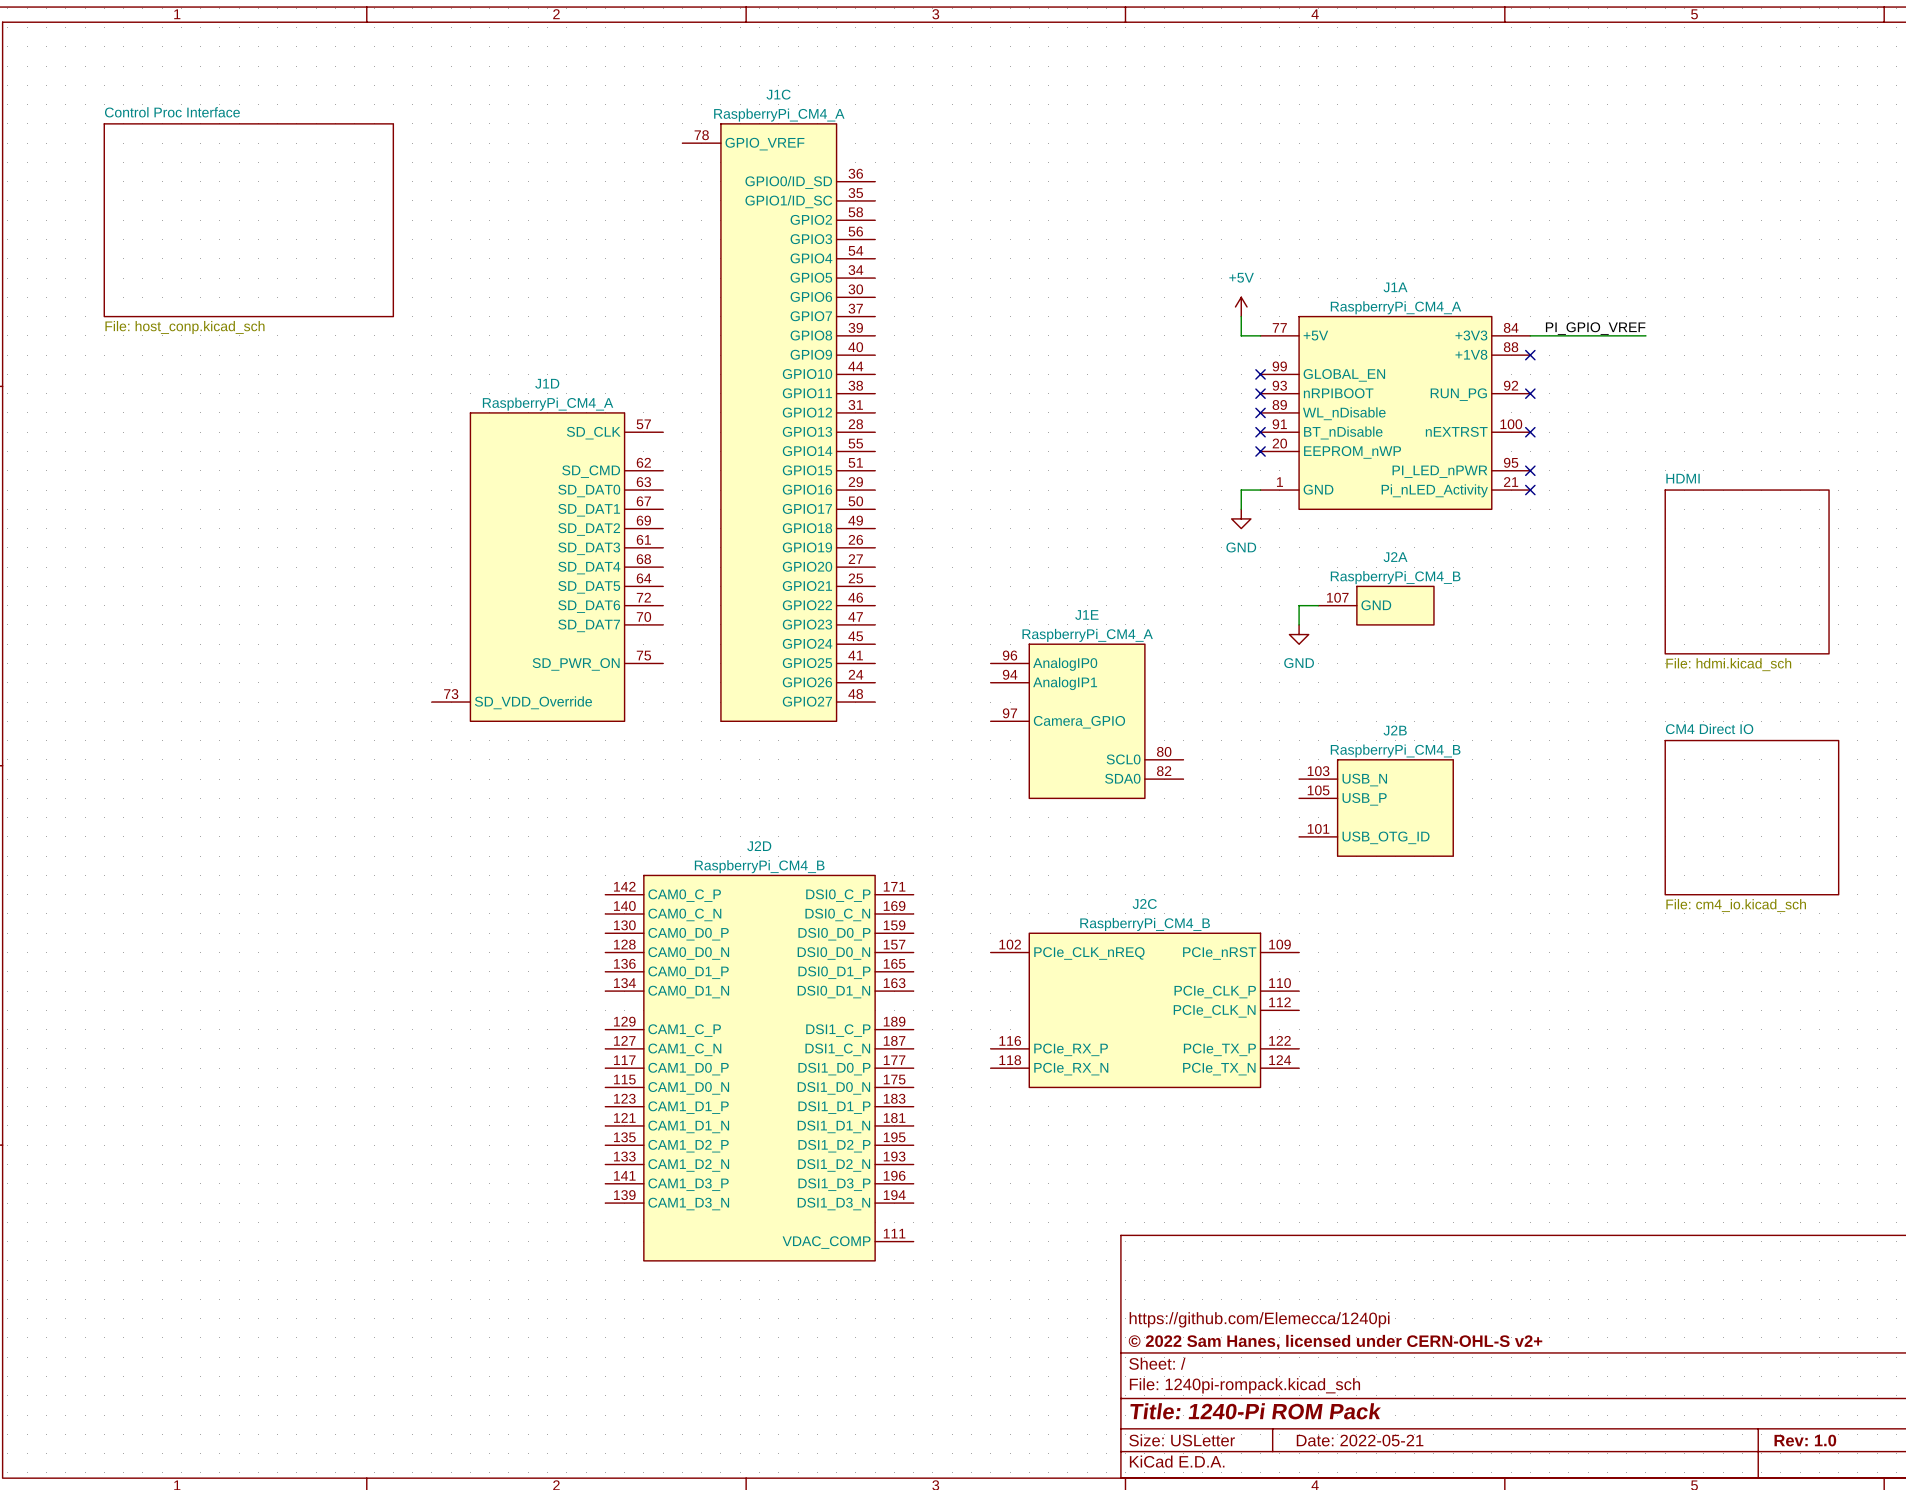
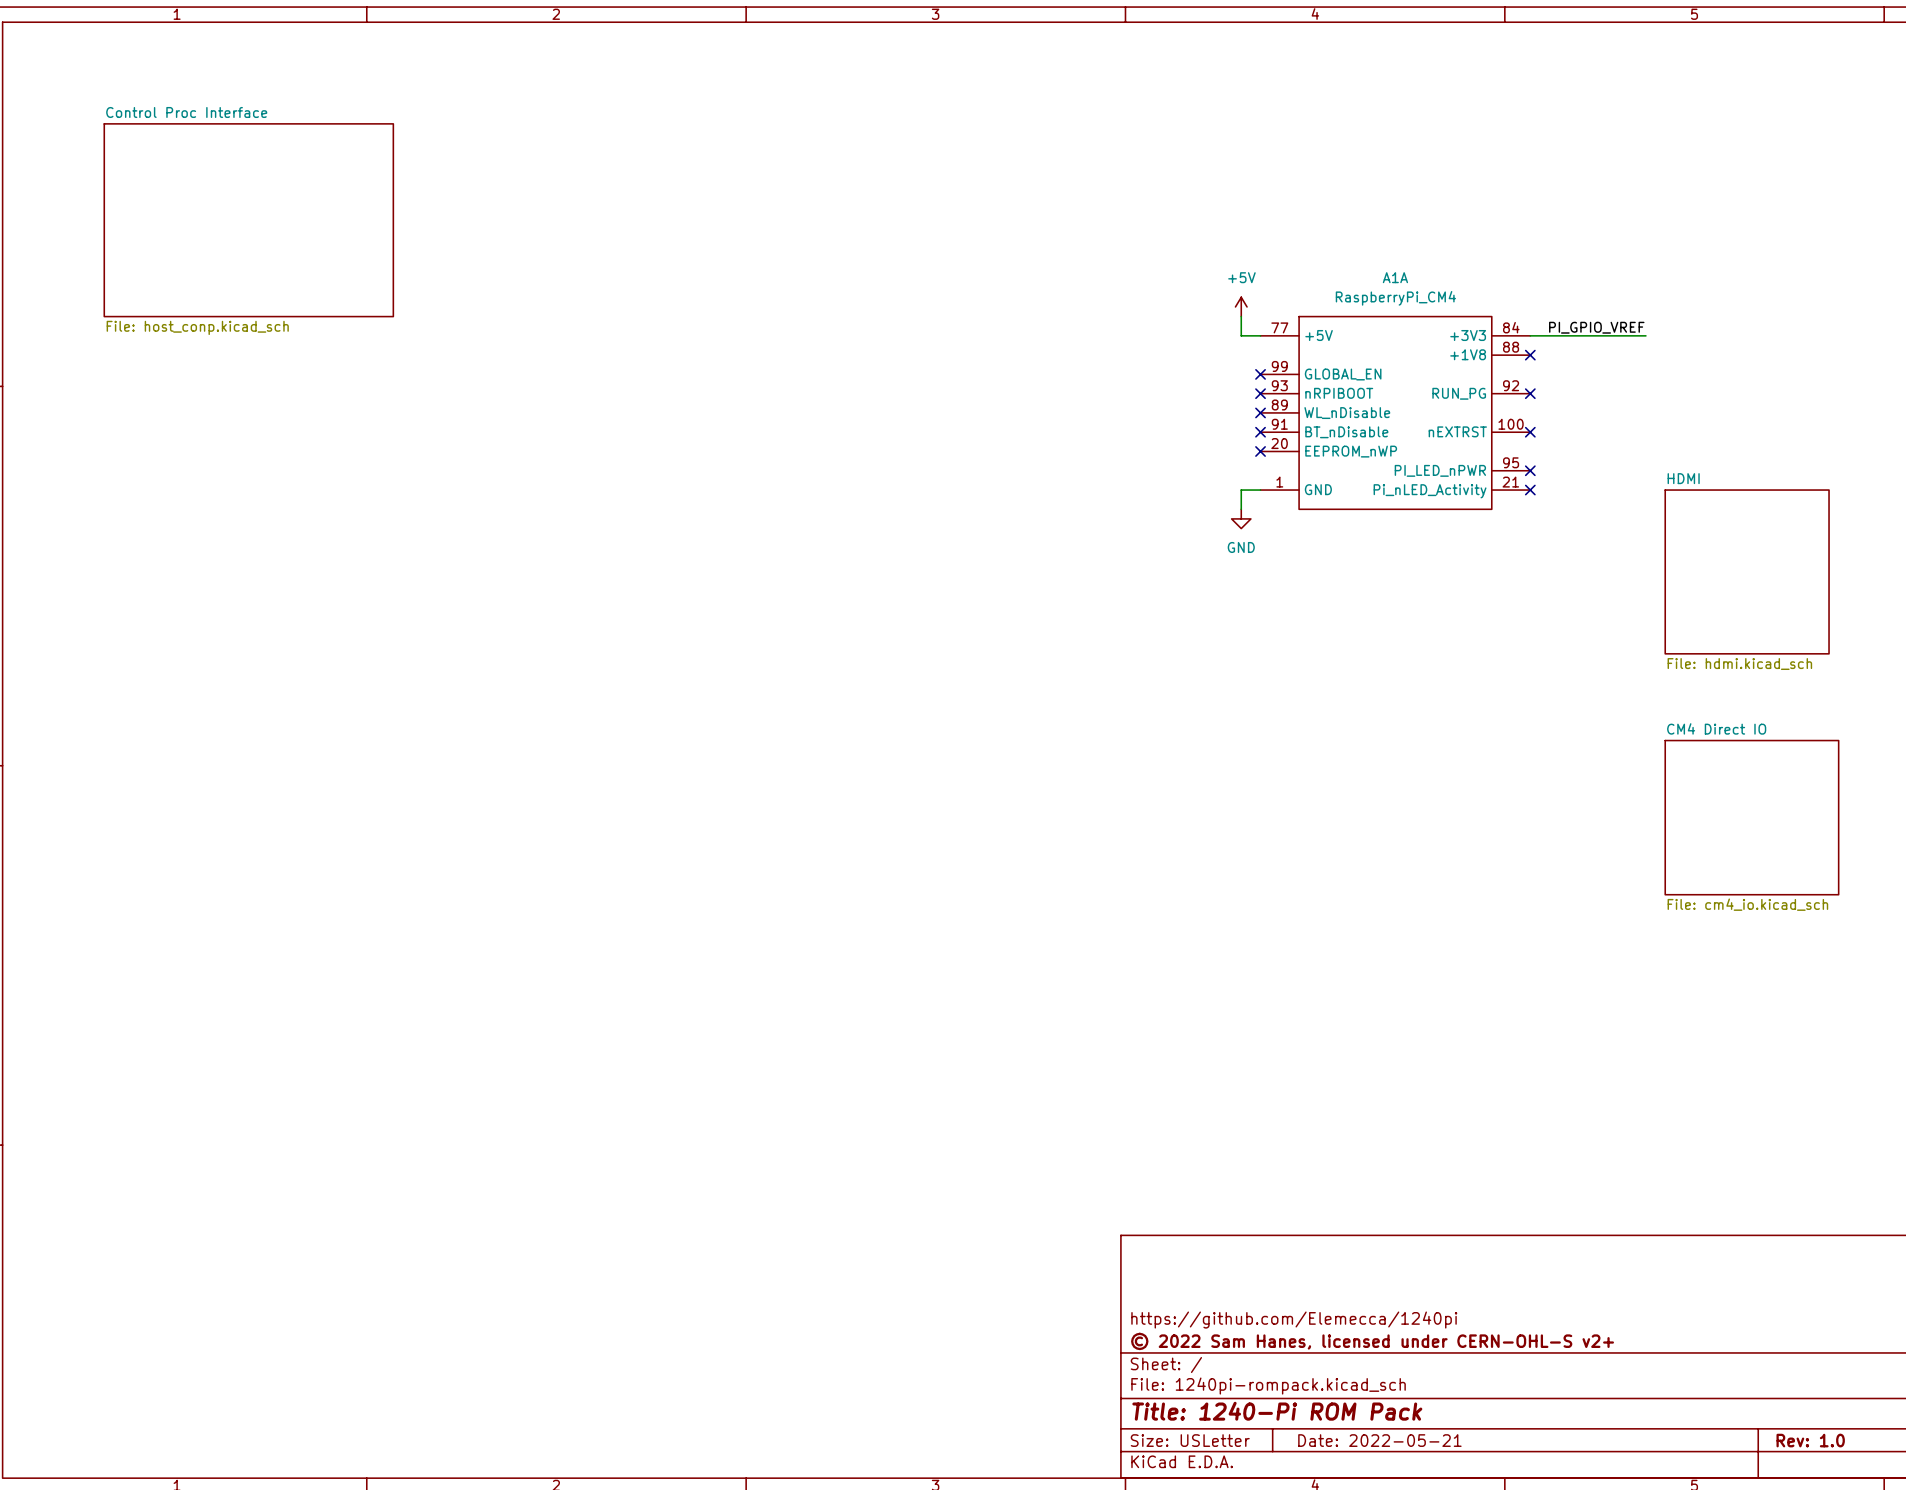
J1A: RaspberryPi_CM4_A (1395, 412) -> none
A1A: none -> RaspberryPi_CM4 (1395, 412)
J1C: RaspberryPi_CM4_A (778, 422) -> none
J1D: RaspberryPi_CM4_A (547, 567) -> none
wire: (1318, 605) (1299, 605) (1299, 624) -> none
J2A: RaspberryPi_CM4_B (1376, 605) -> none
power symbol: GND (1299, 634) -> none
J1E: RaspberryPi_CM4_A (1087, 721) -> none
J2B: RaspberryPi_CM4_B (1376, 808) -> none
J2C: RaspberryPi_CM4_B (1144, 1010) -> none
J2D: RaspberryPi_CM4_B (759, 1068) -> none

